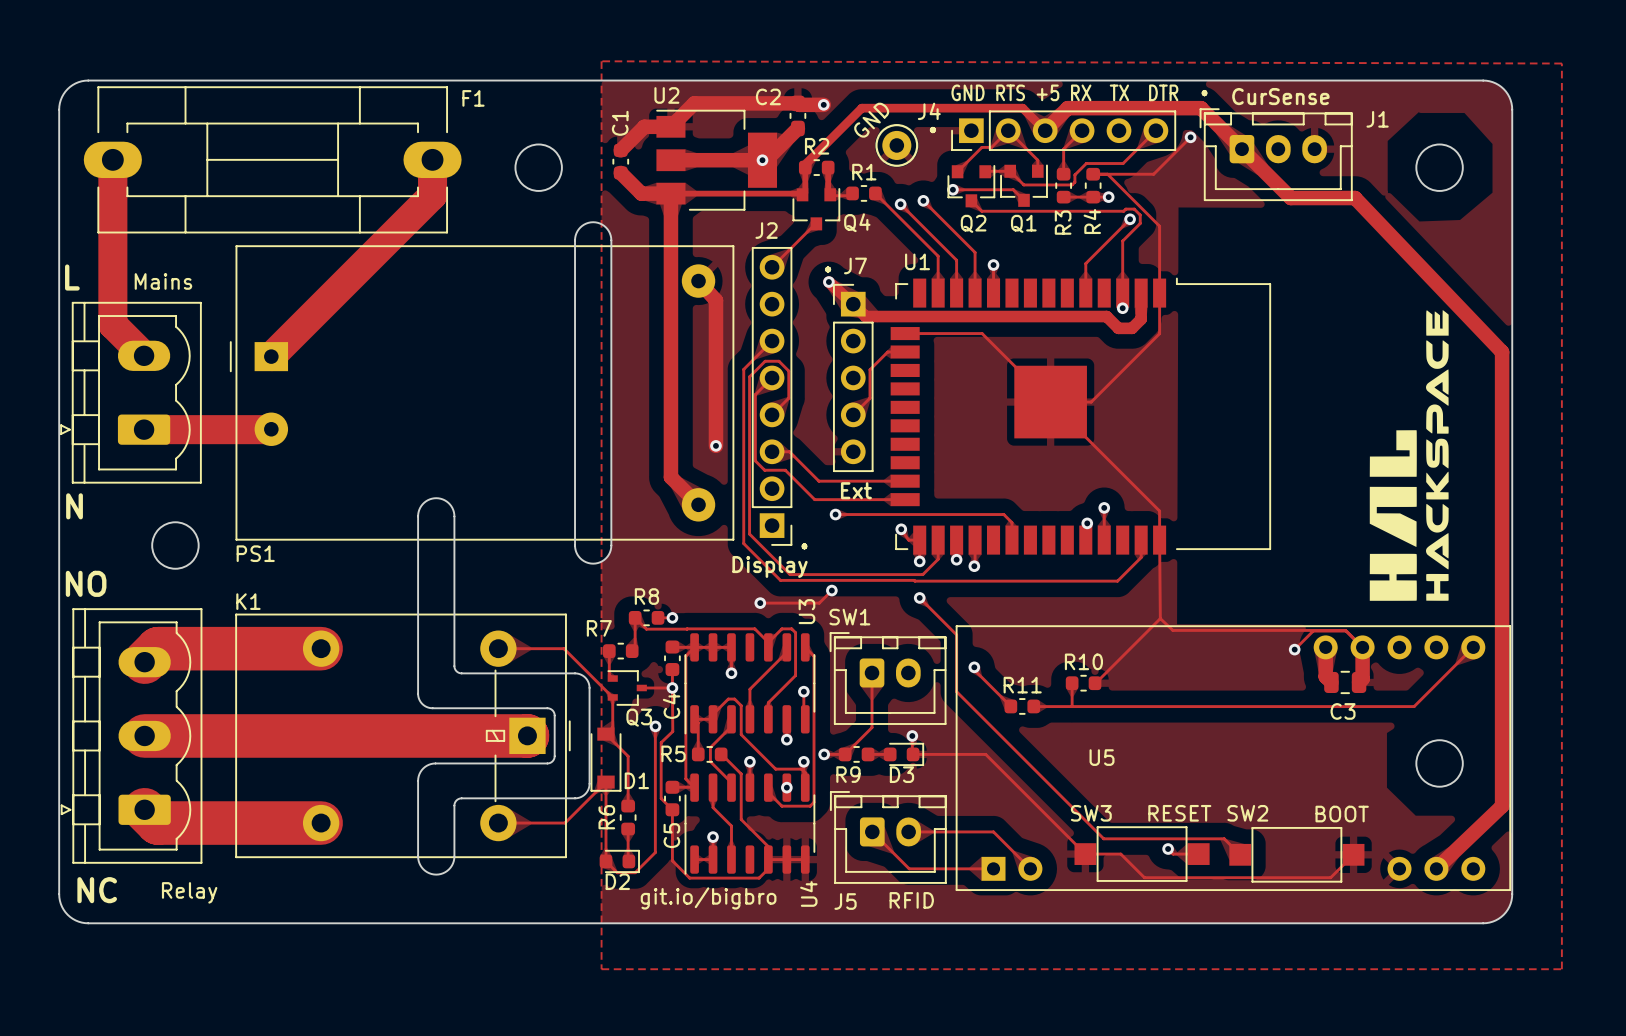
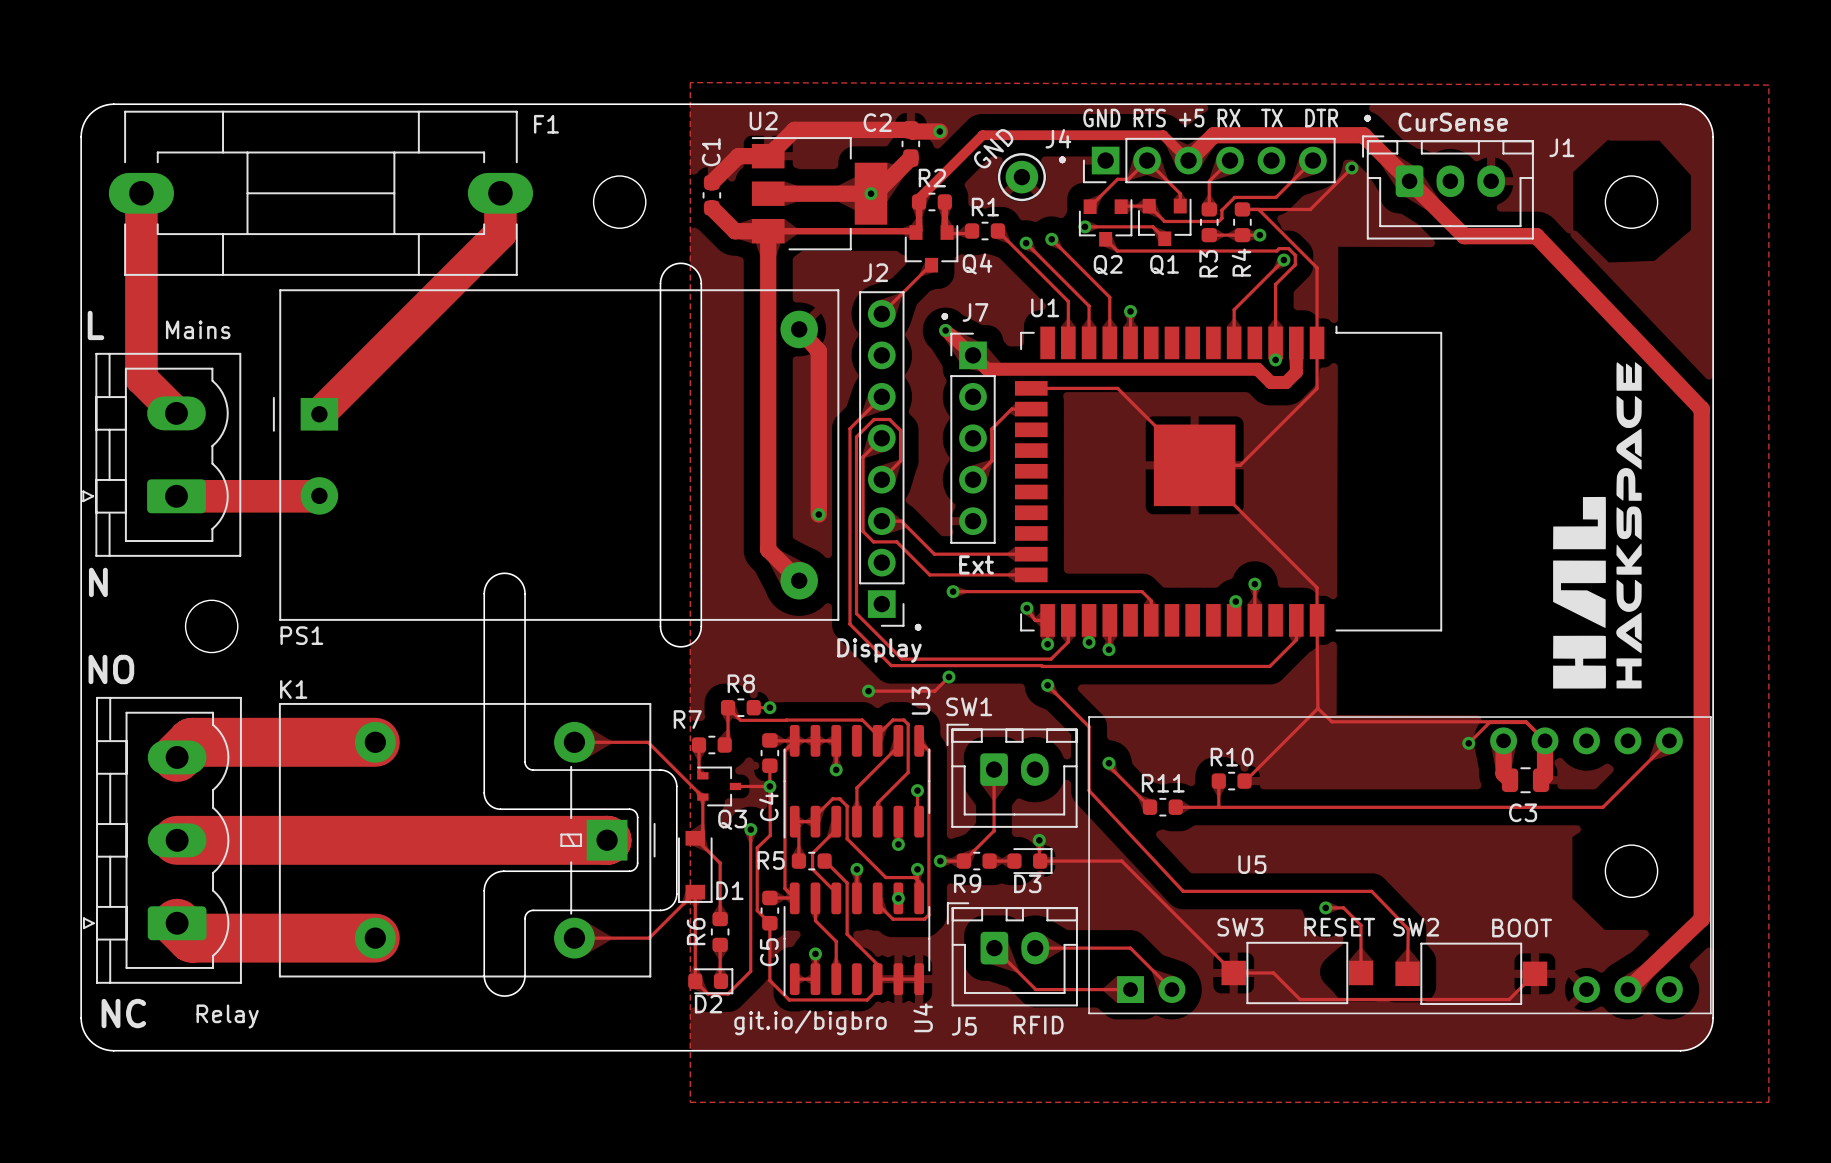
track: (956, 691) (1103, 838) (1224, 838) (1240, 854) -> (1089, 790) (1183, 891) (1371, 891) (1408, 929) (1407, 973)
track: (1168, 848) (1173, 854) (1198, 854) -> (1325, 907) (1343, 907) (1360, 925) (1360, 972)
via position: (1168, 848) -> (1325, 907)

